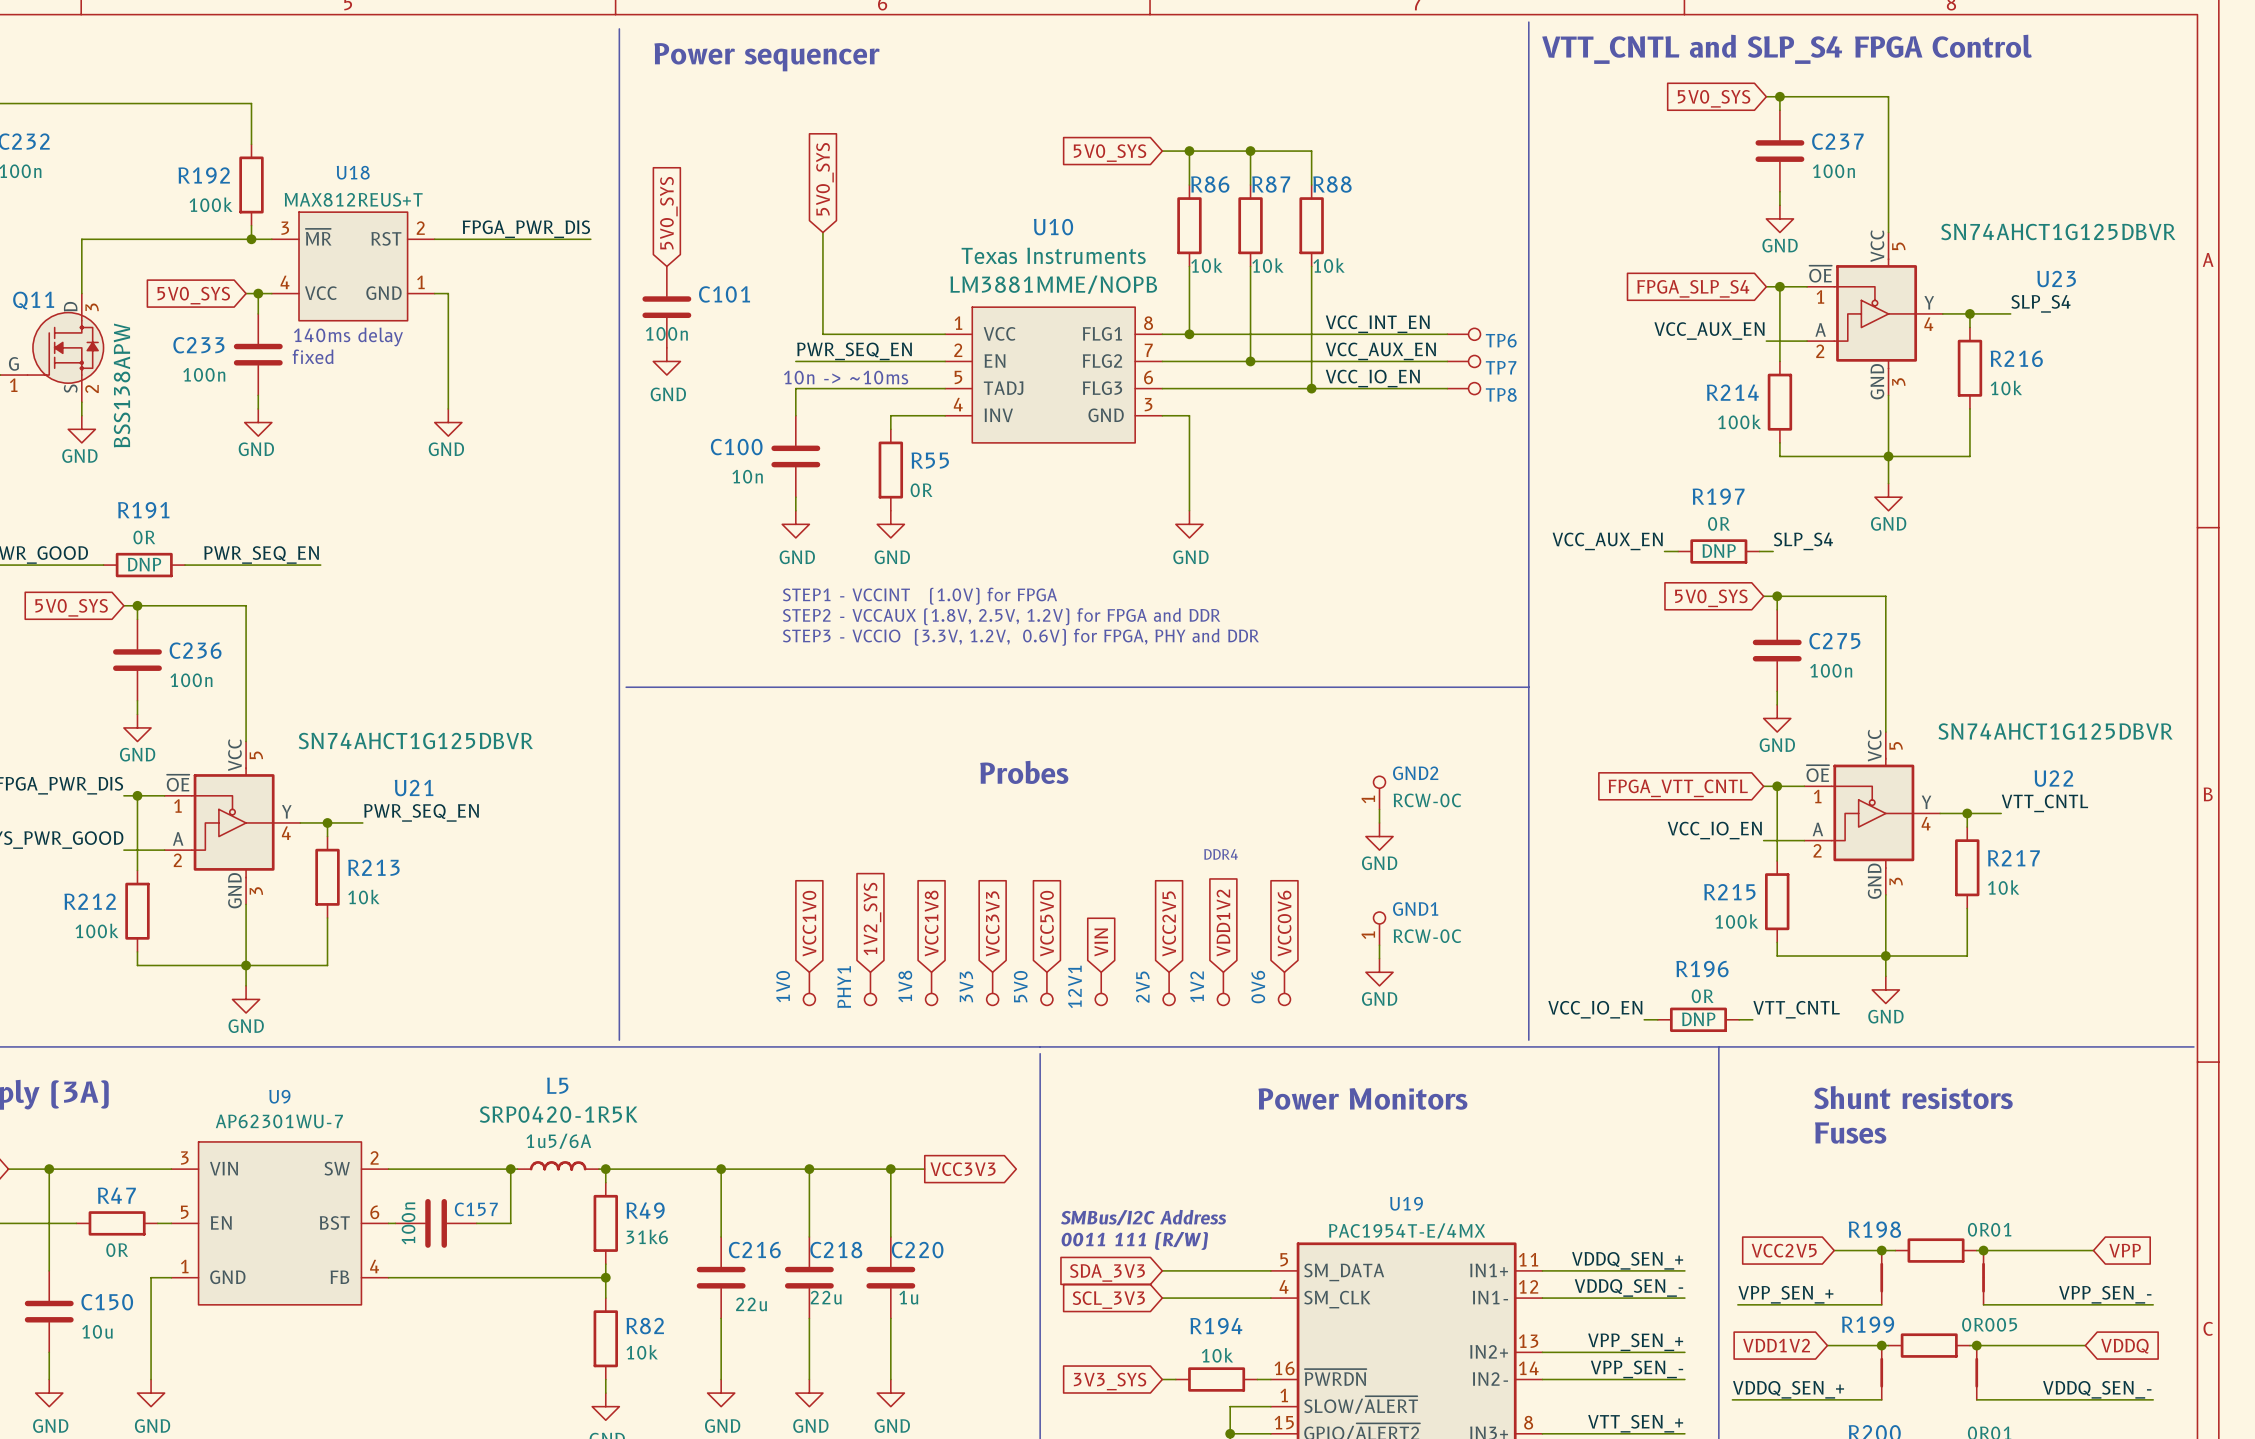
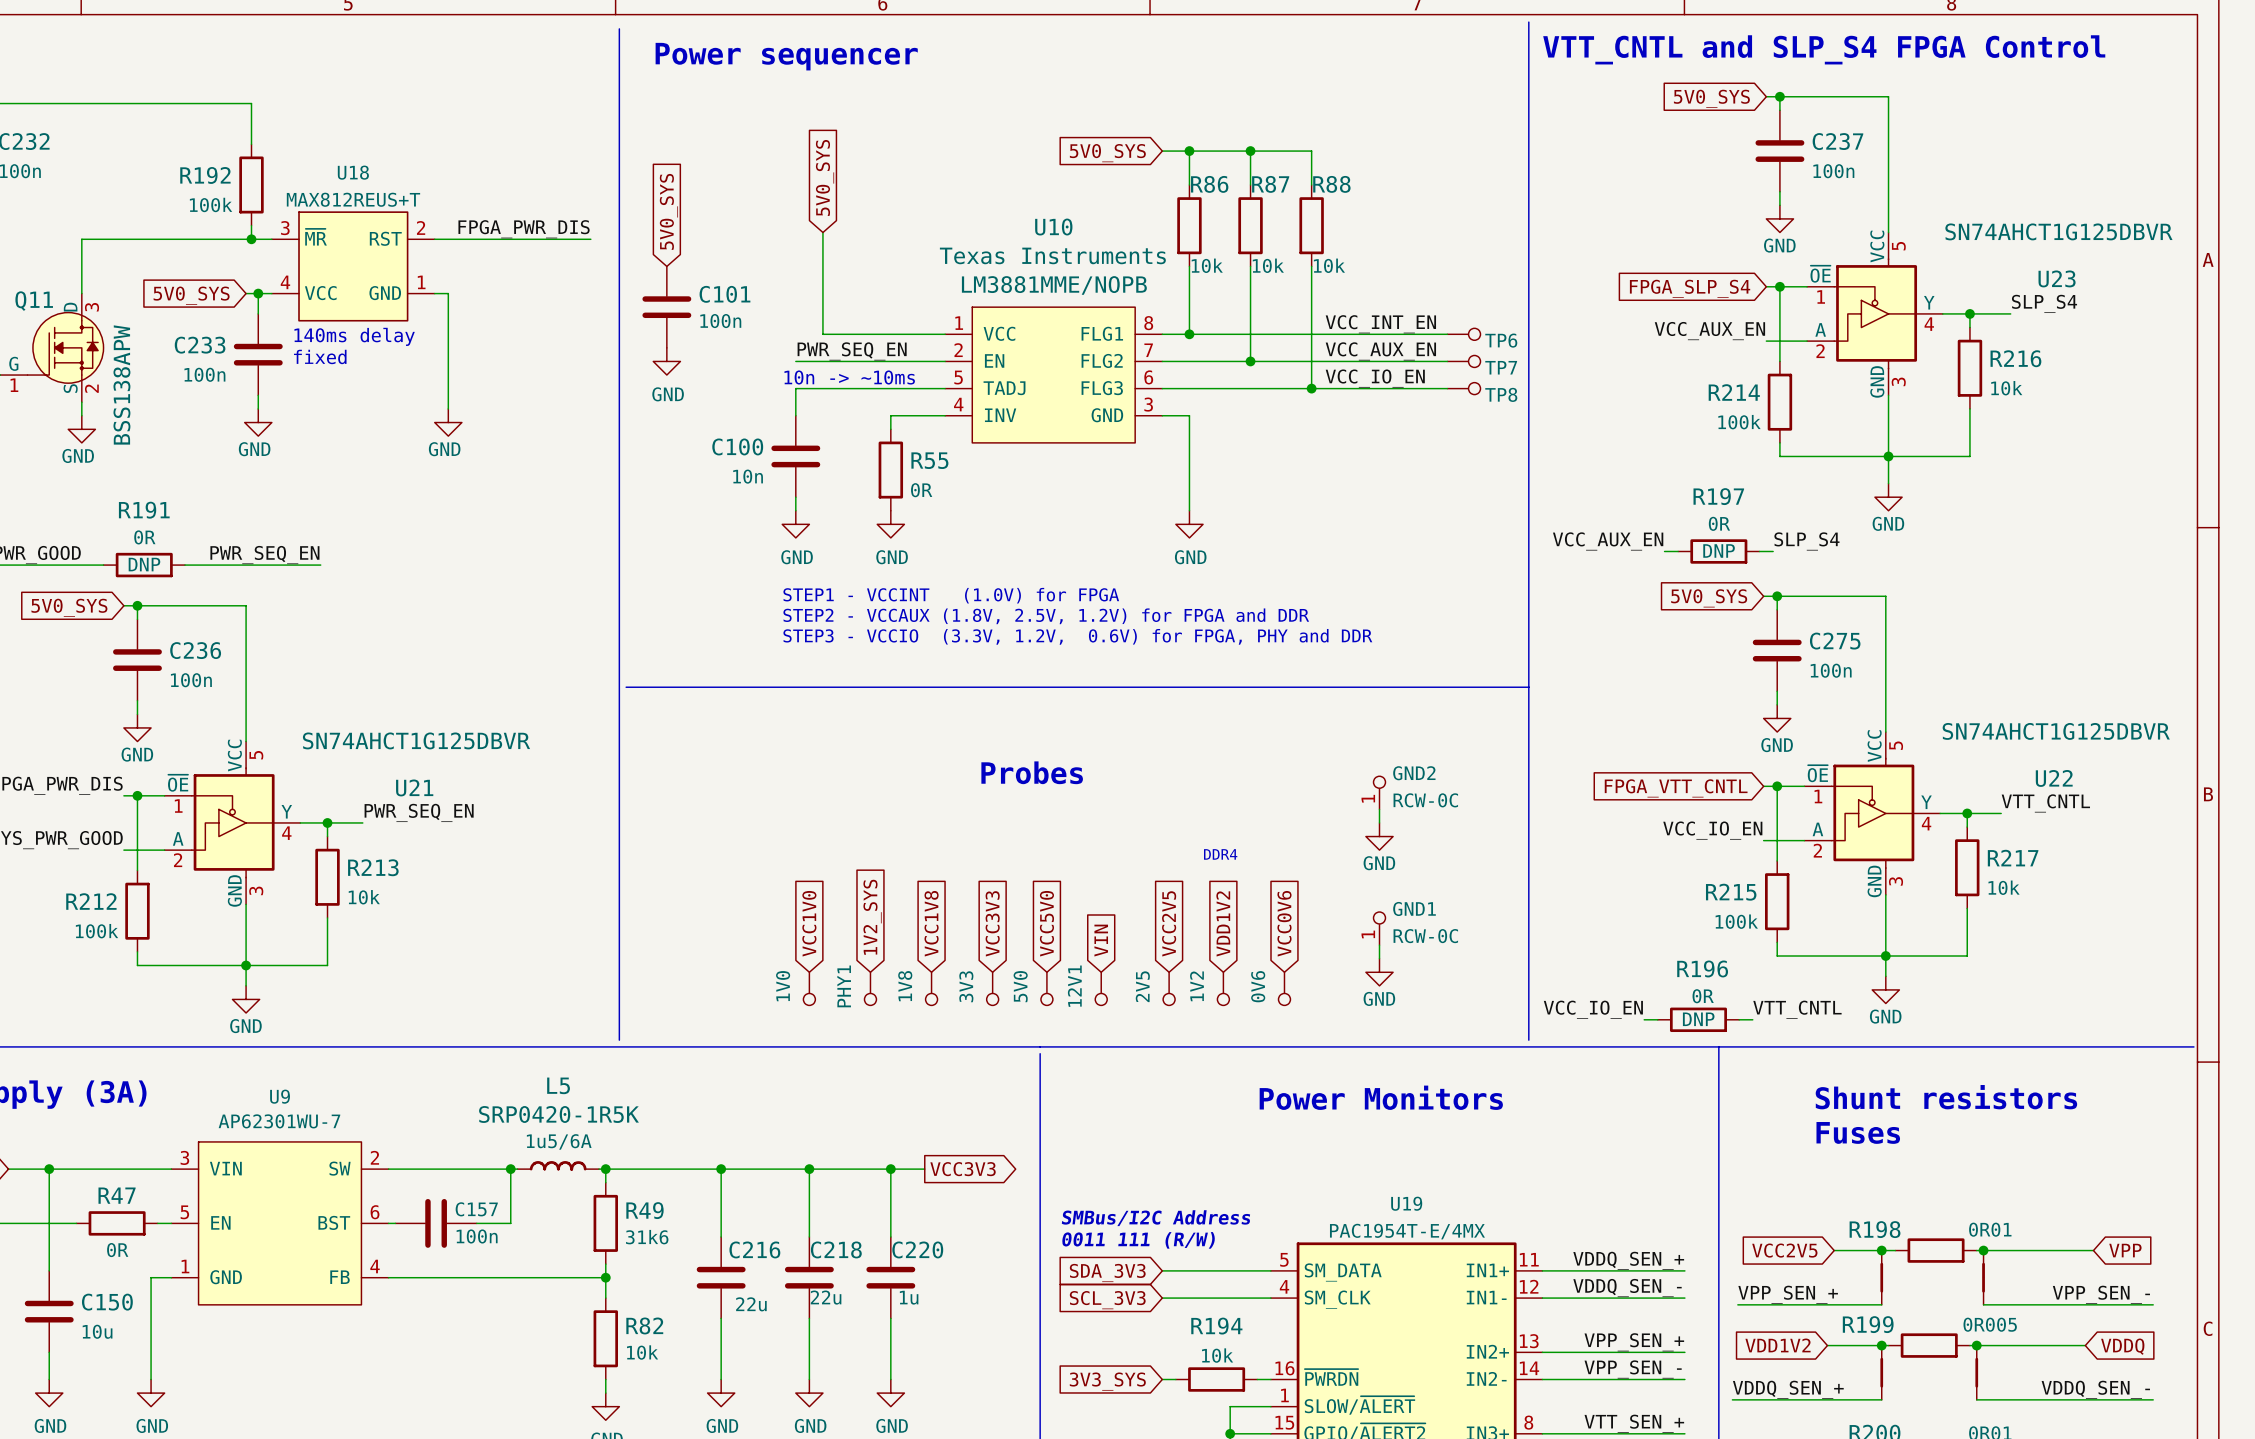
C101 text position: 100n (666, 333) -> 100n (720, 321)
C157 text rotation: 0° (408, 1223) -> 90° clockwise (477, 1236)
C157 text position: 100n (408, 1223) -> 100n (477, 1236)

